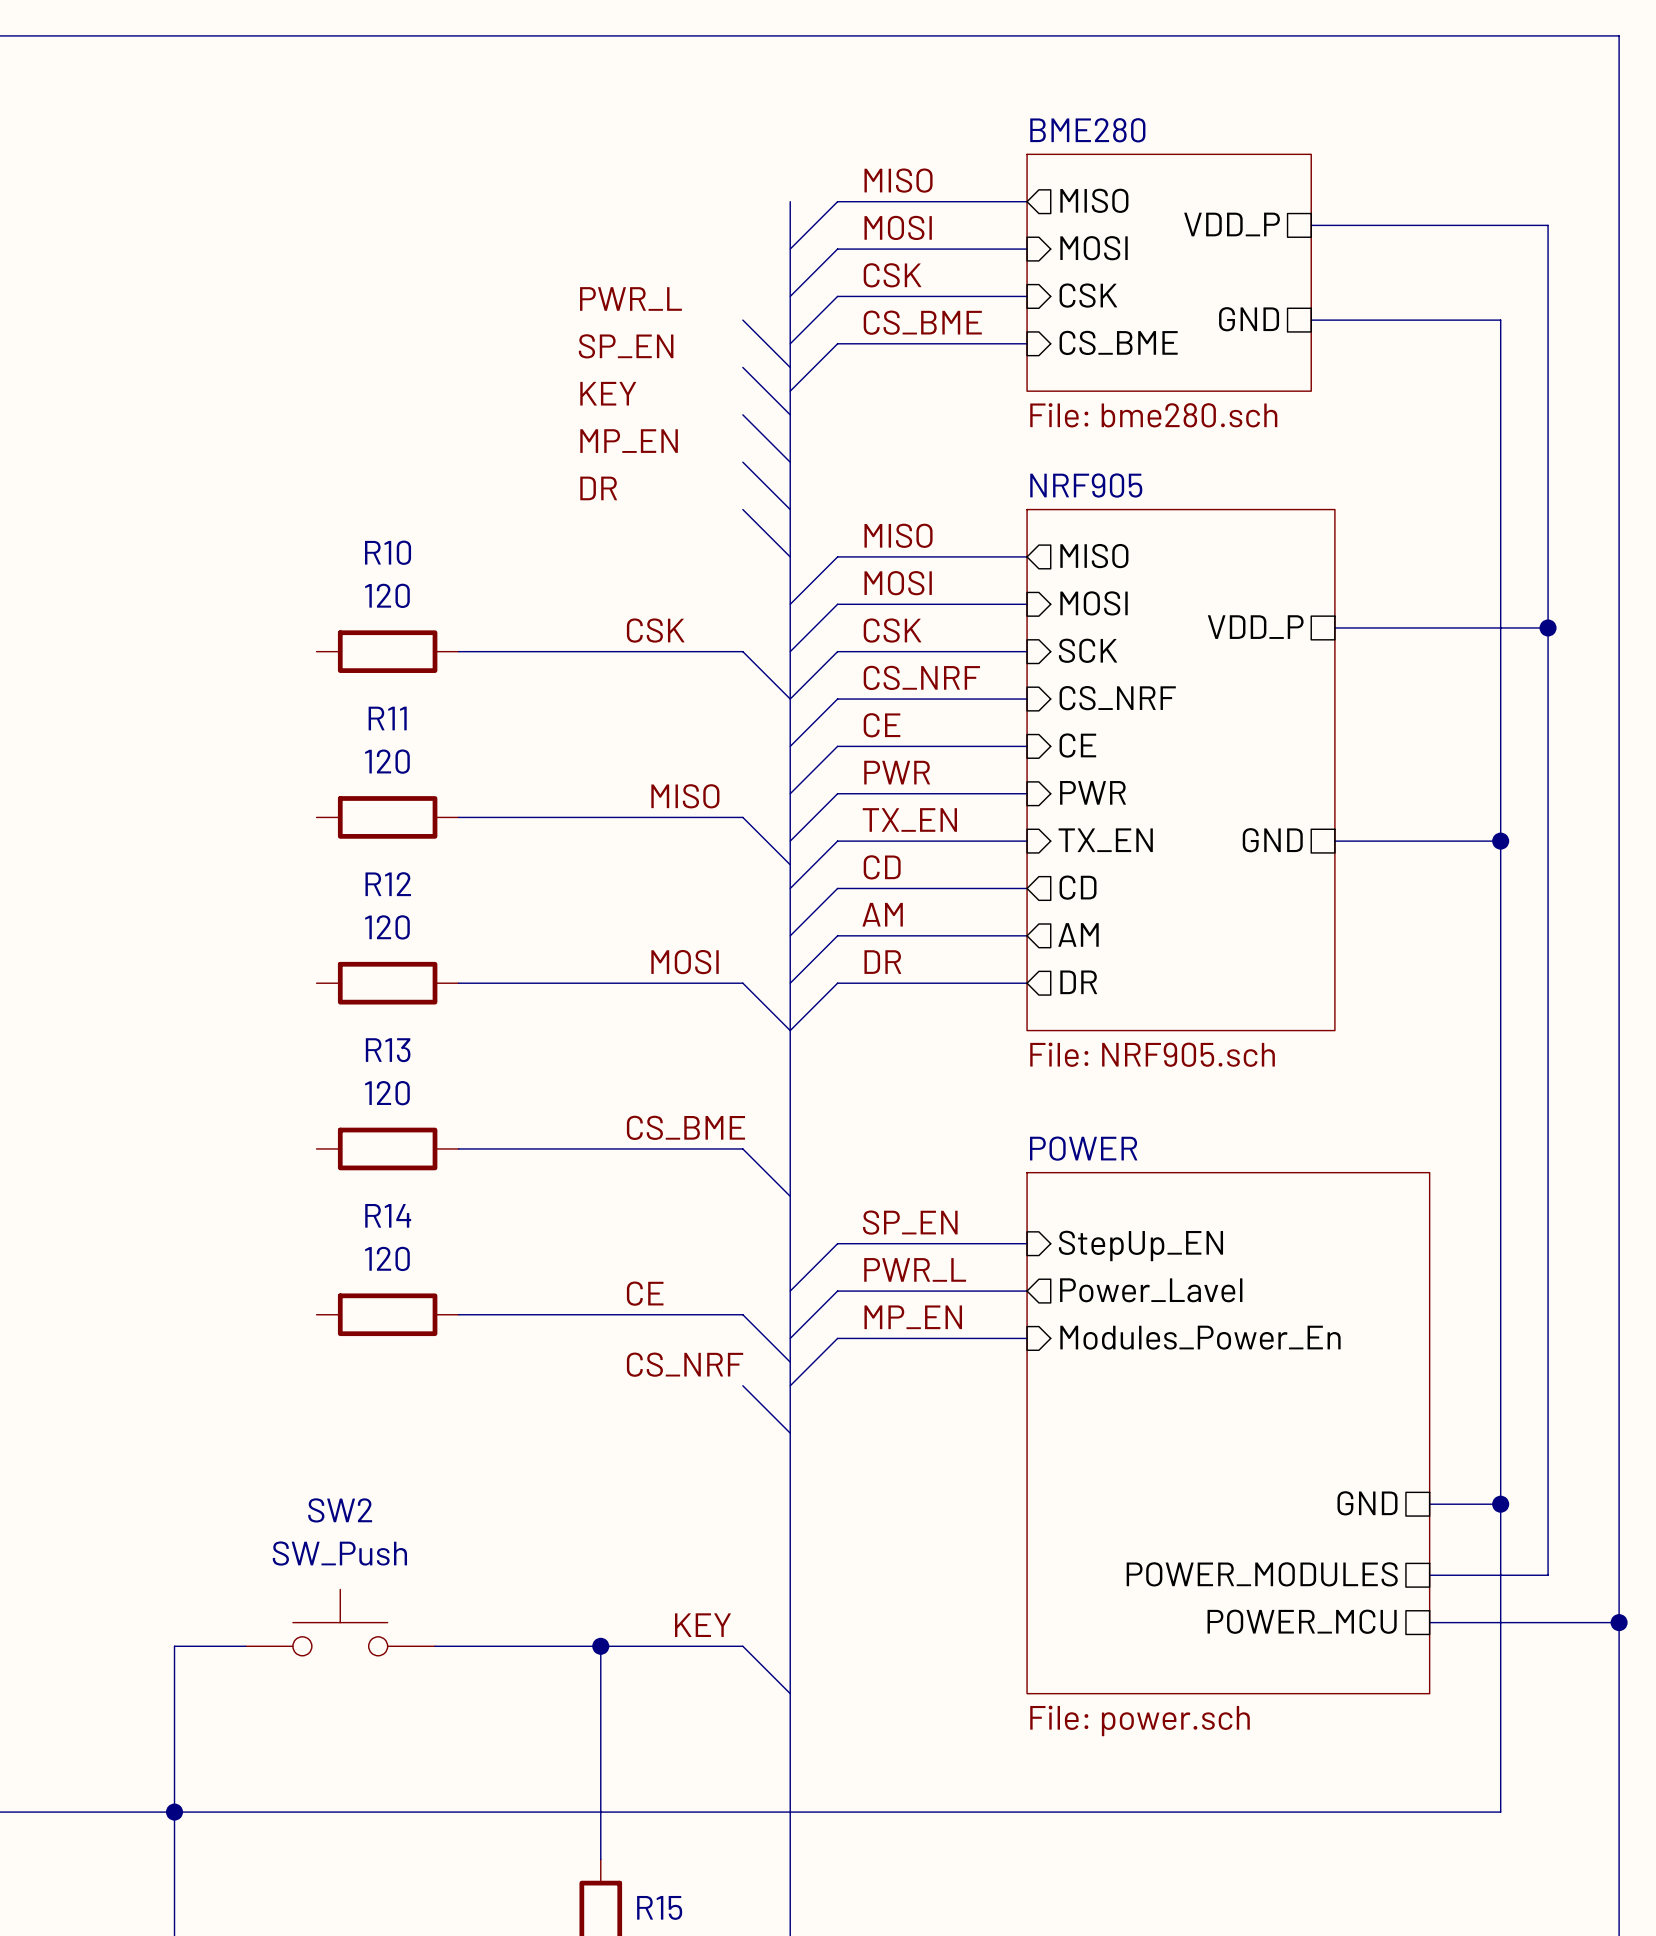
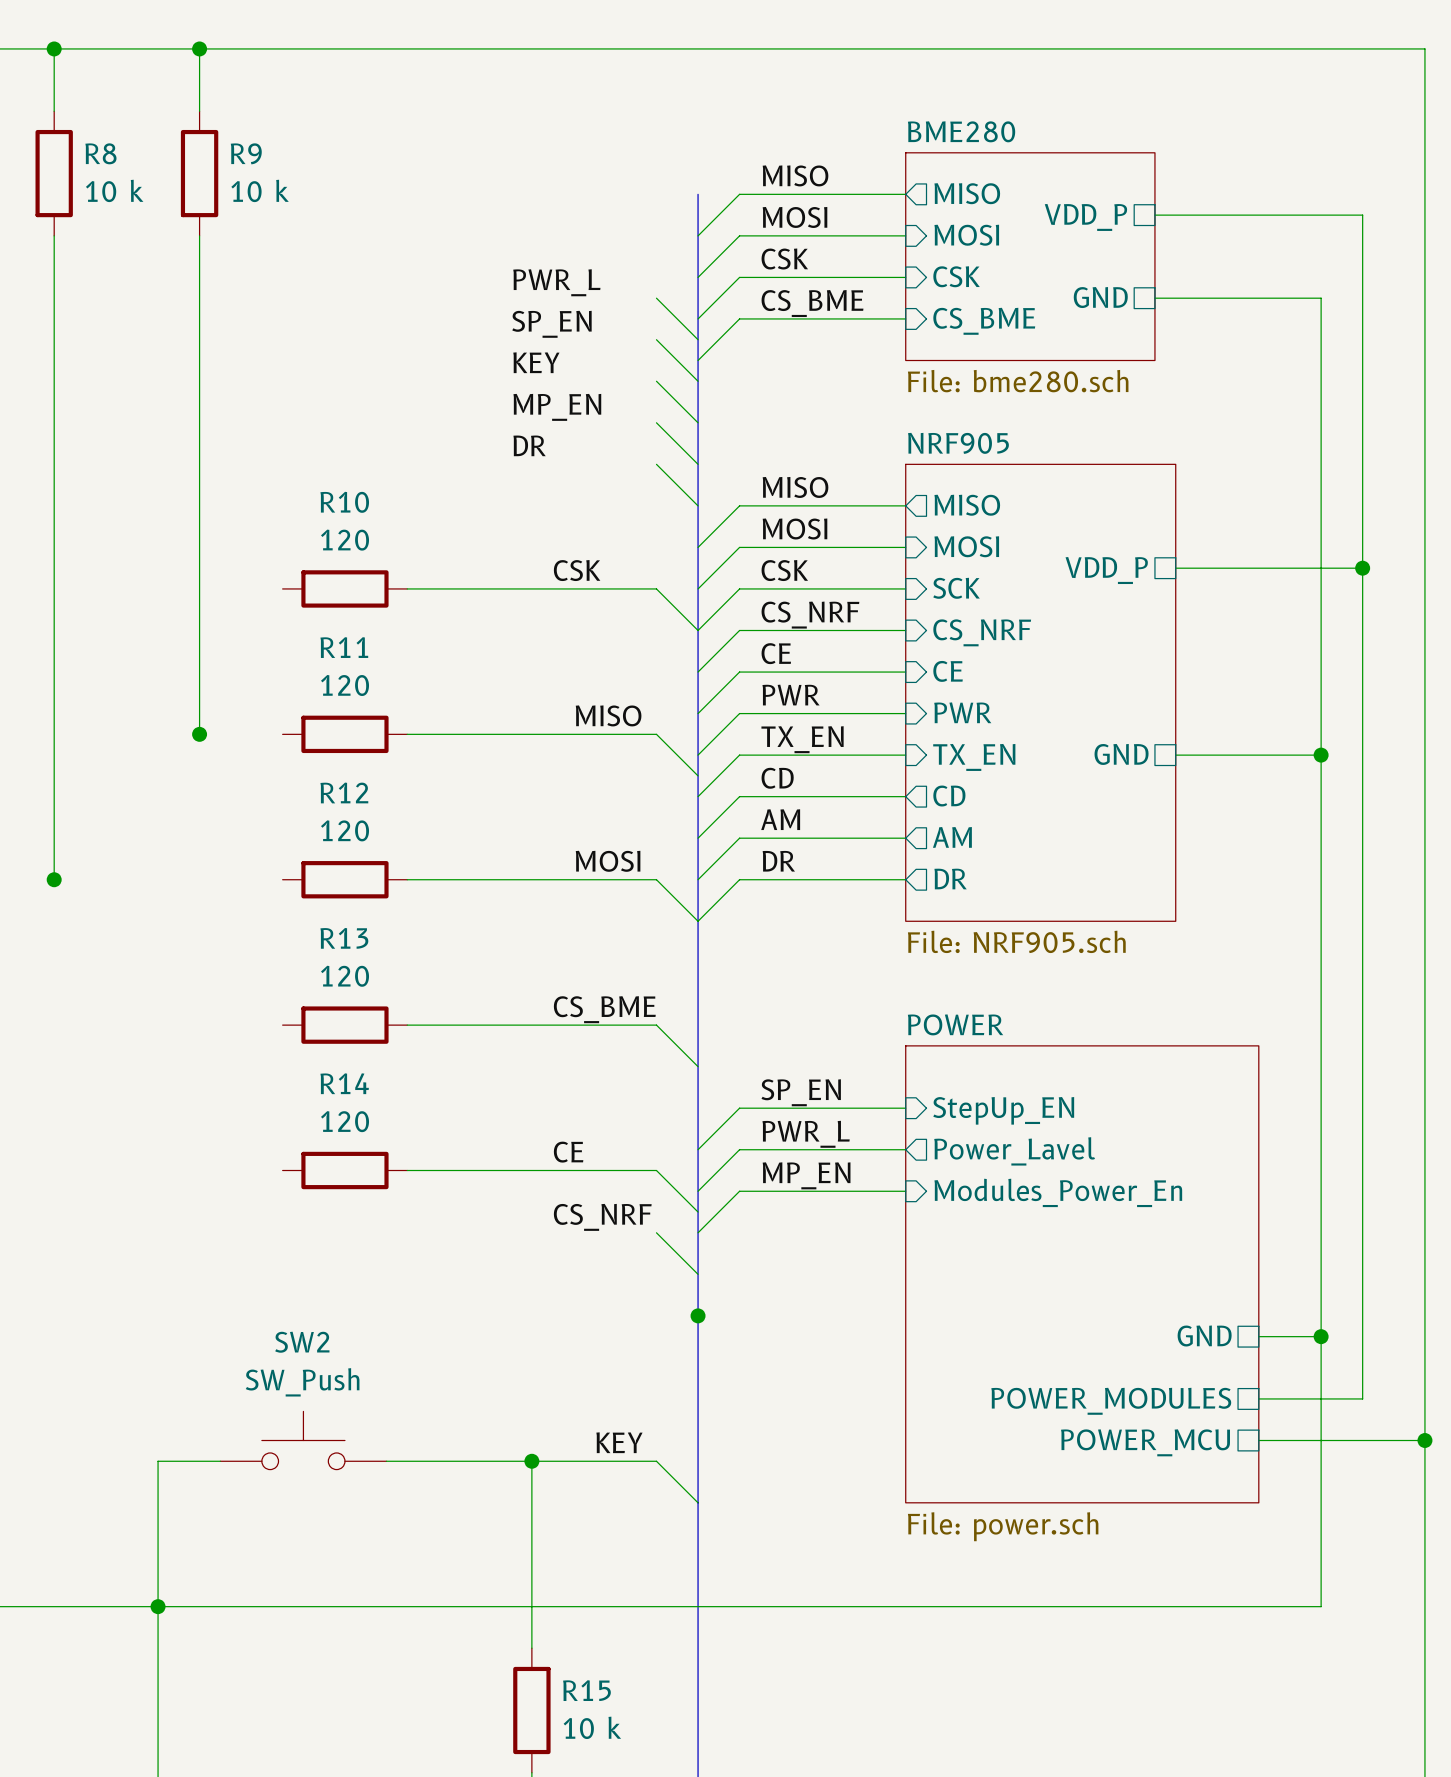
wire: none -> (54, 48) (54, 111)
junction: none -> (54, 48)
wire: none -> (199, 48) (199, 111)
junction: none -> (199, 48)
R8: none -> 10 k (54, 173)
R9: none -> 10 k (199, 173)
wire: none -> (54, 235) (54, 879)
wire: none -> (199, 235) (199, 734)
junction: none -> (199, 734)
junction: none -> (54, 879)
junction: none -> (698, 1315)

